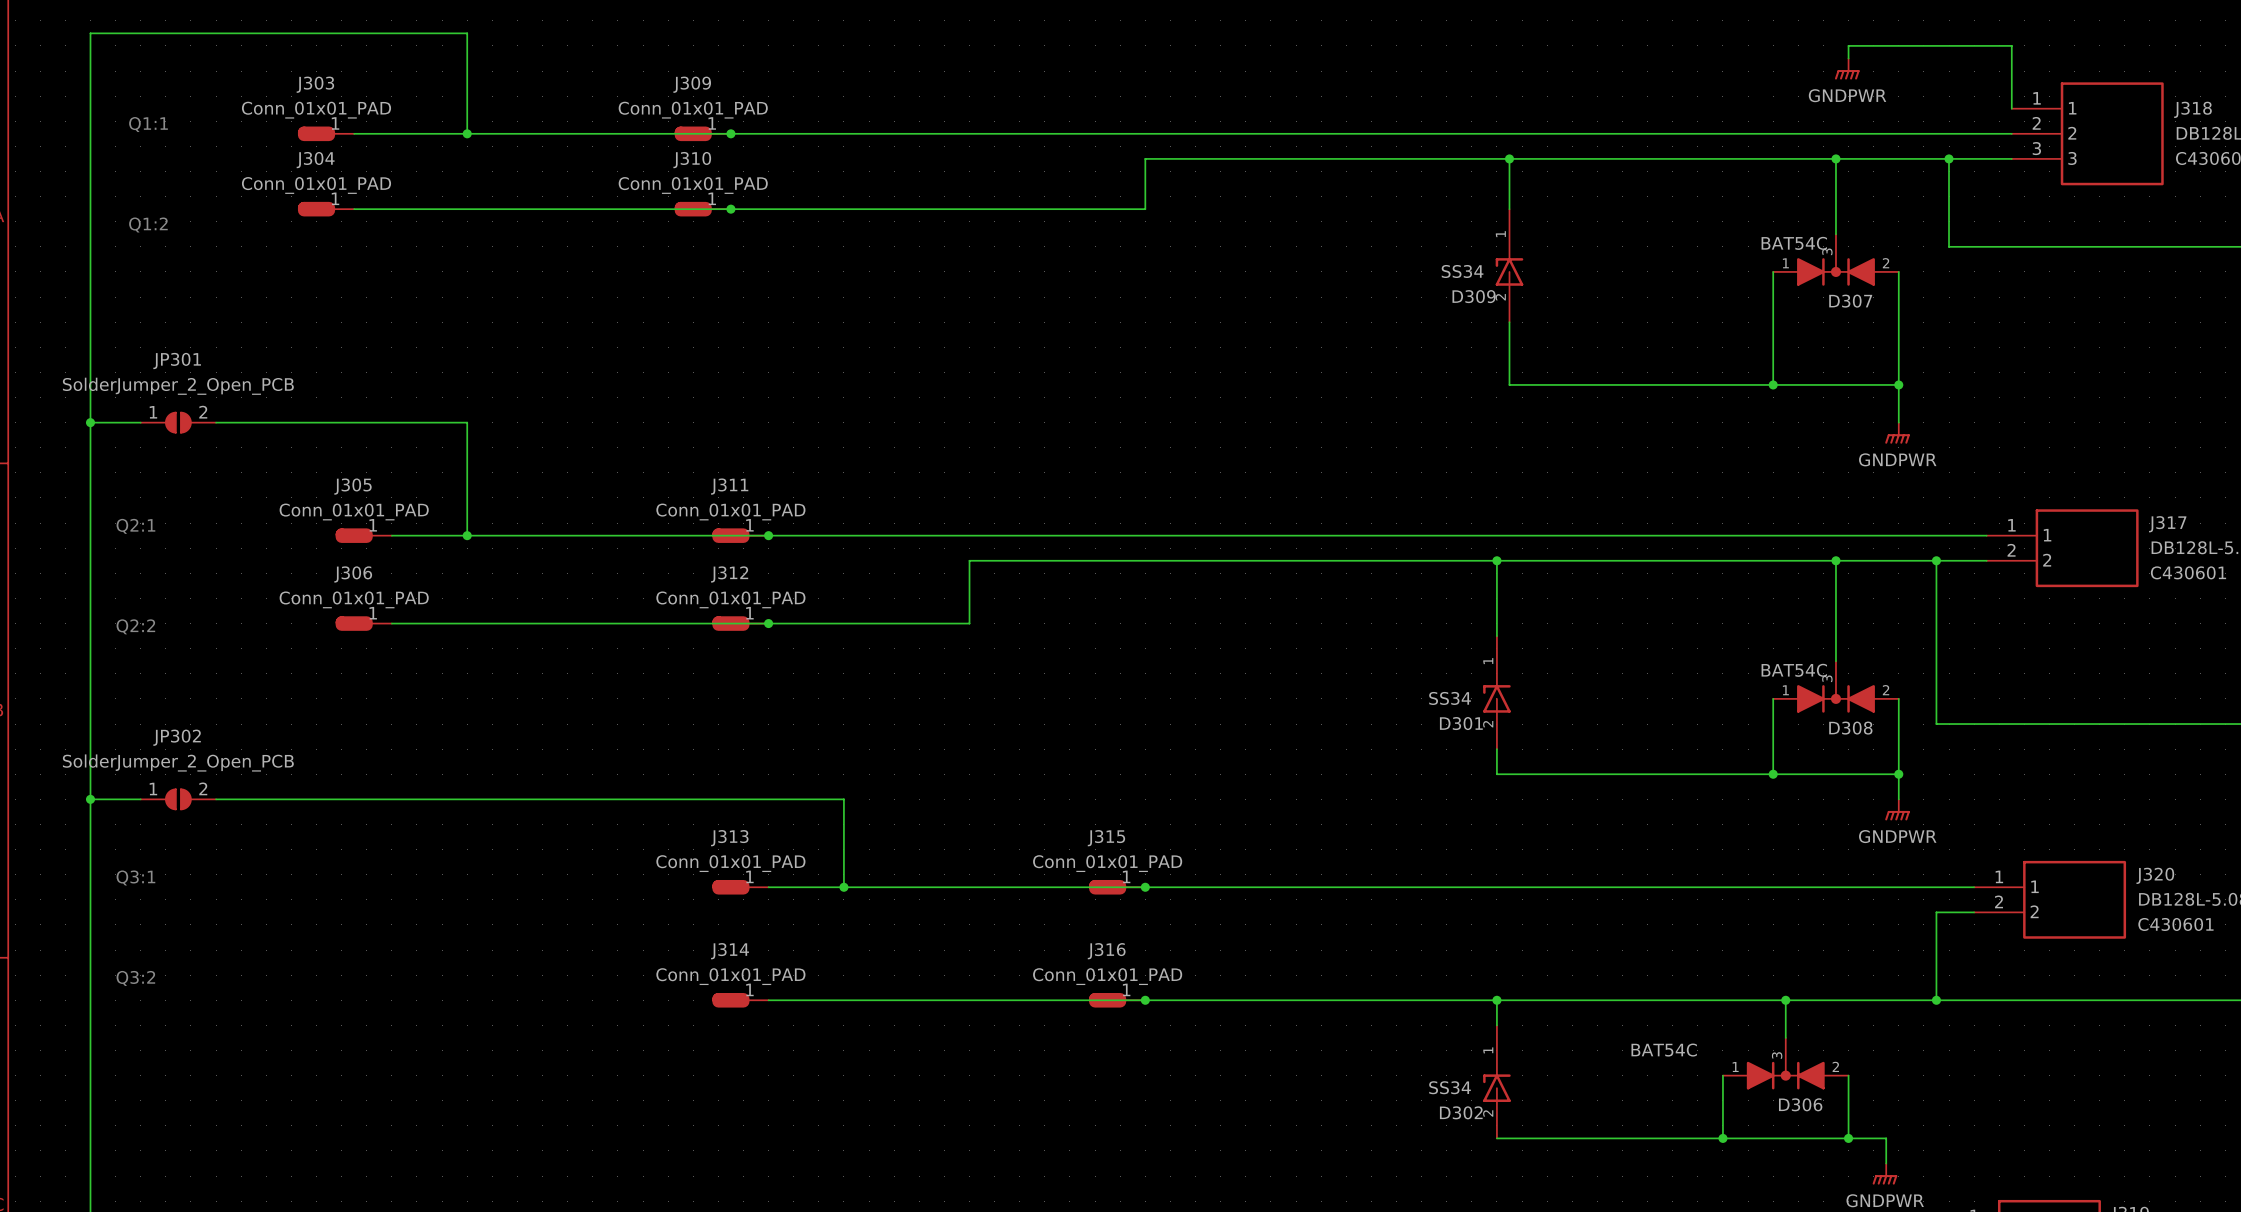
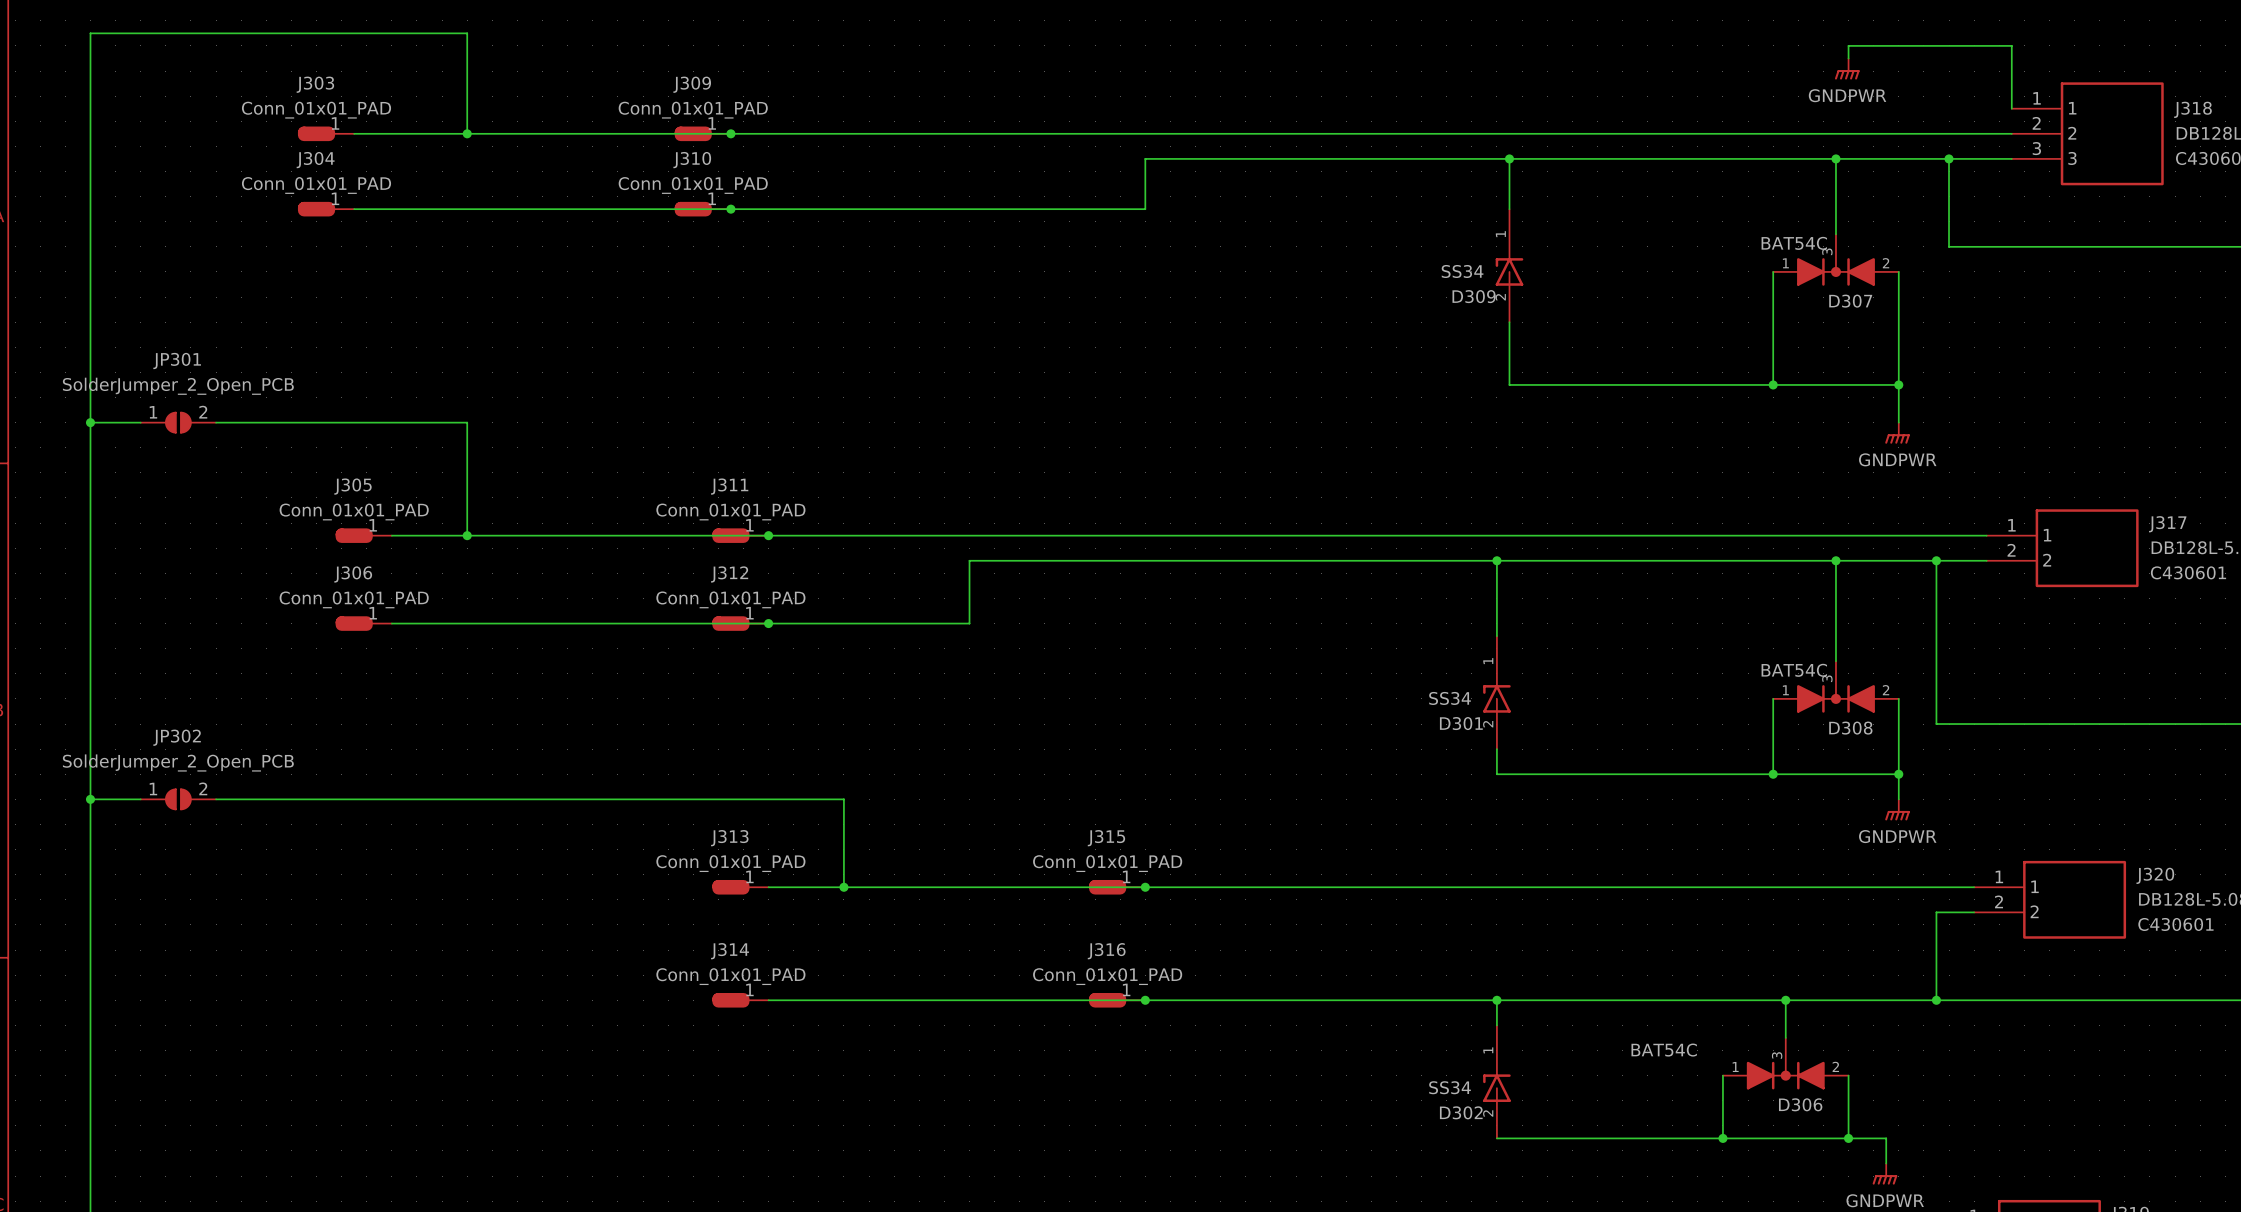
text: Q1:1 (148, 124) -> none
text: Q1:2 (148, 224) -> none
text: Q2:1 (135, 526) -> none
text: Q2:2 (135, 626) -> none
text: Q3:1 (135, 877) -> none
text: Q3:2 (135, 978) -> none

